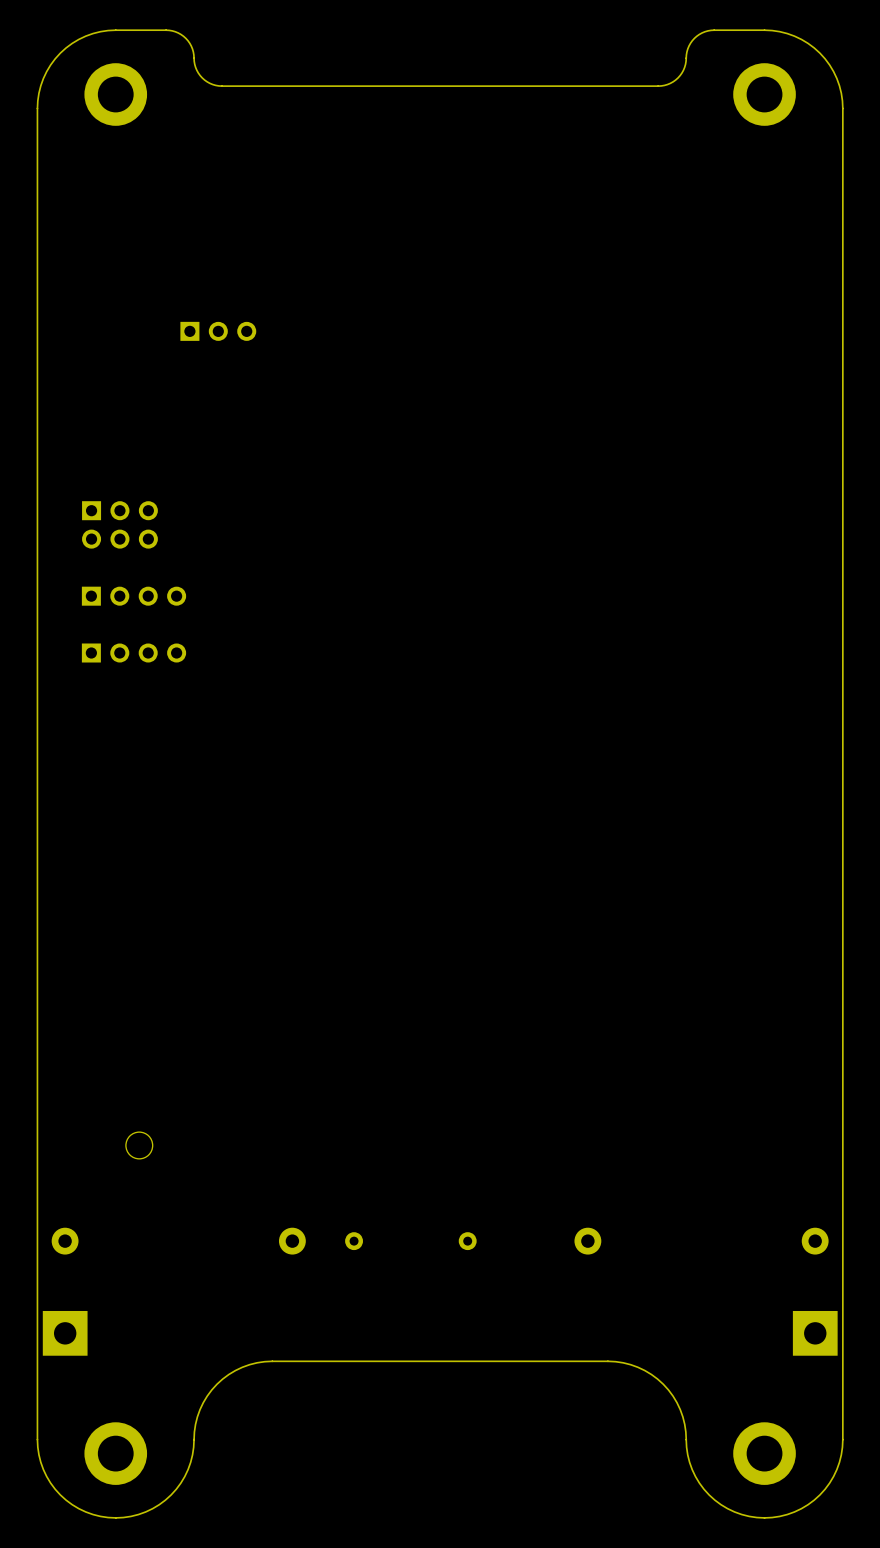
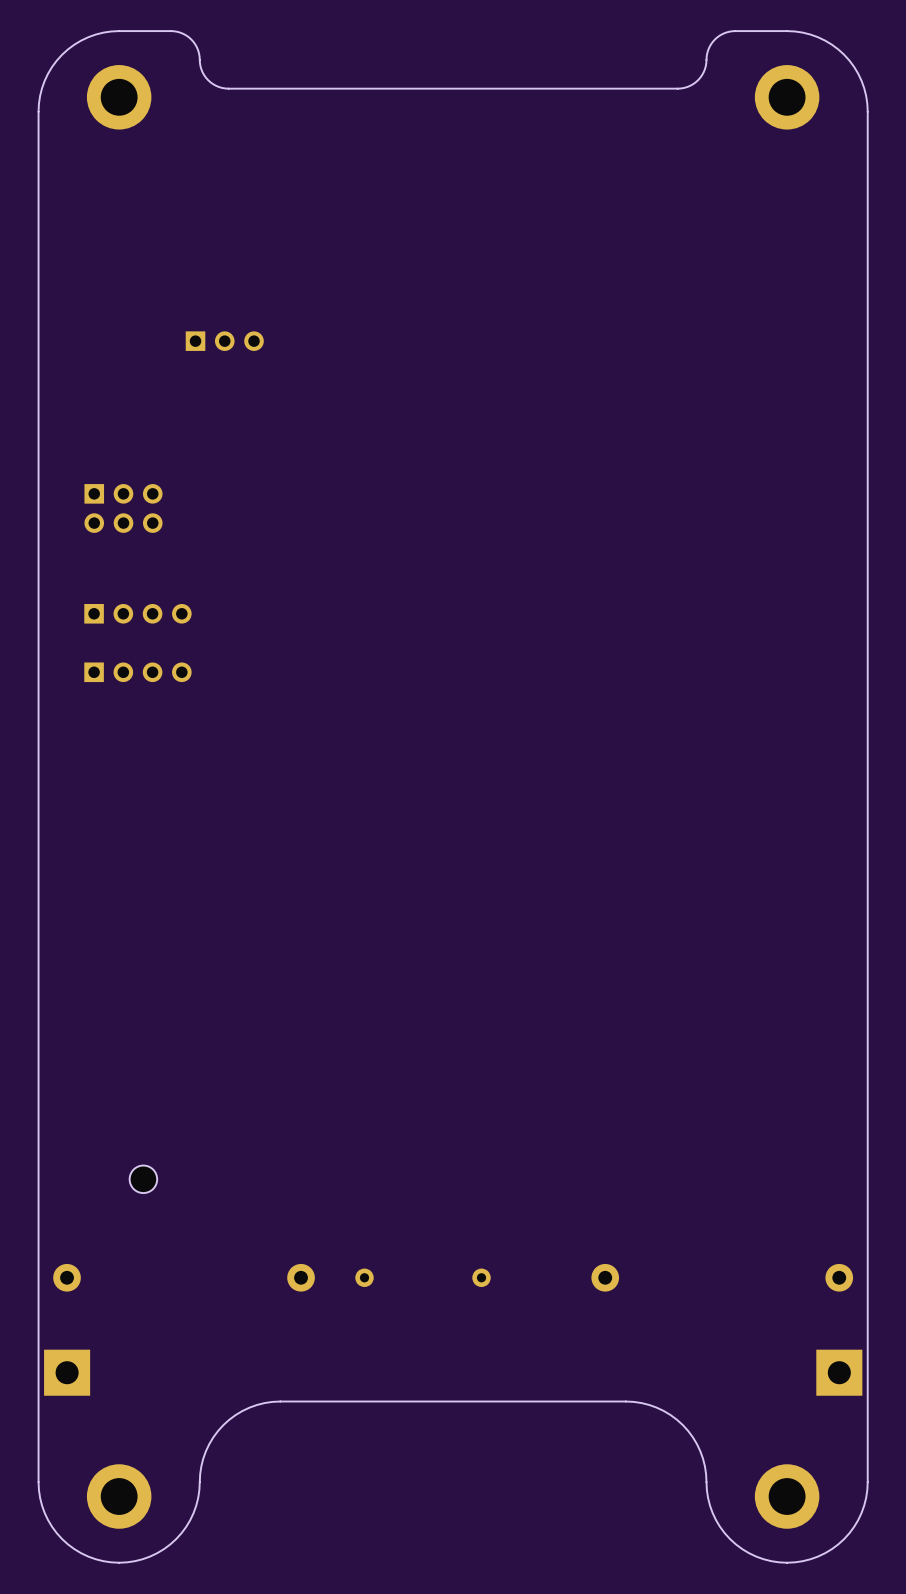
part position: (119, 524) -> (123, 508)

